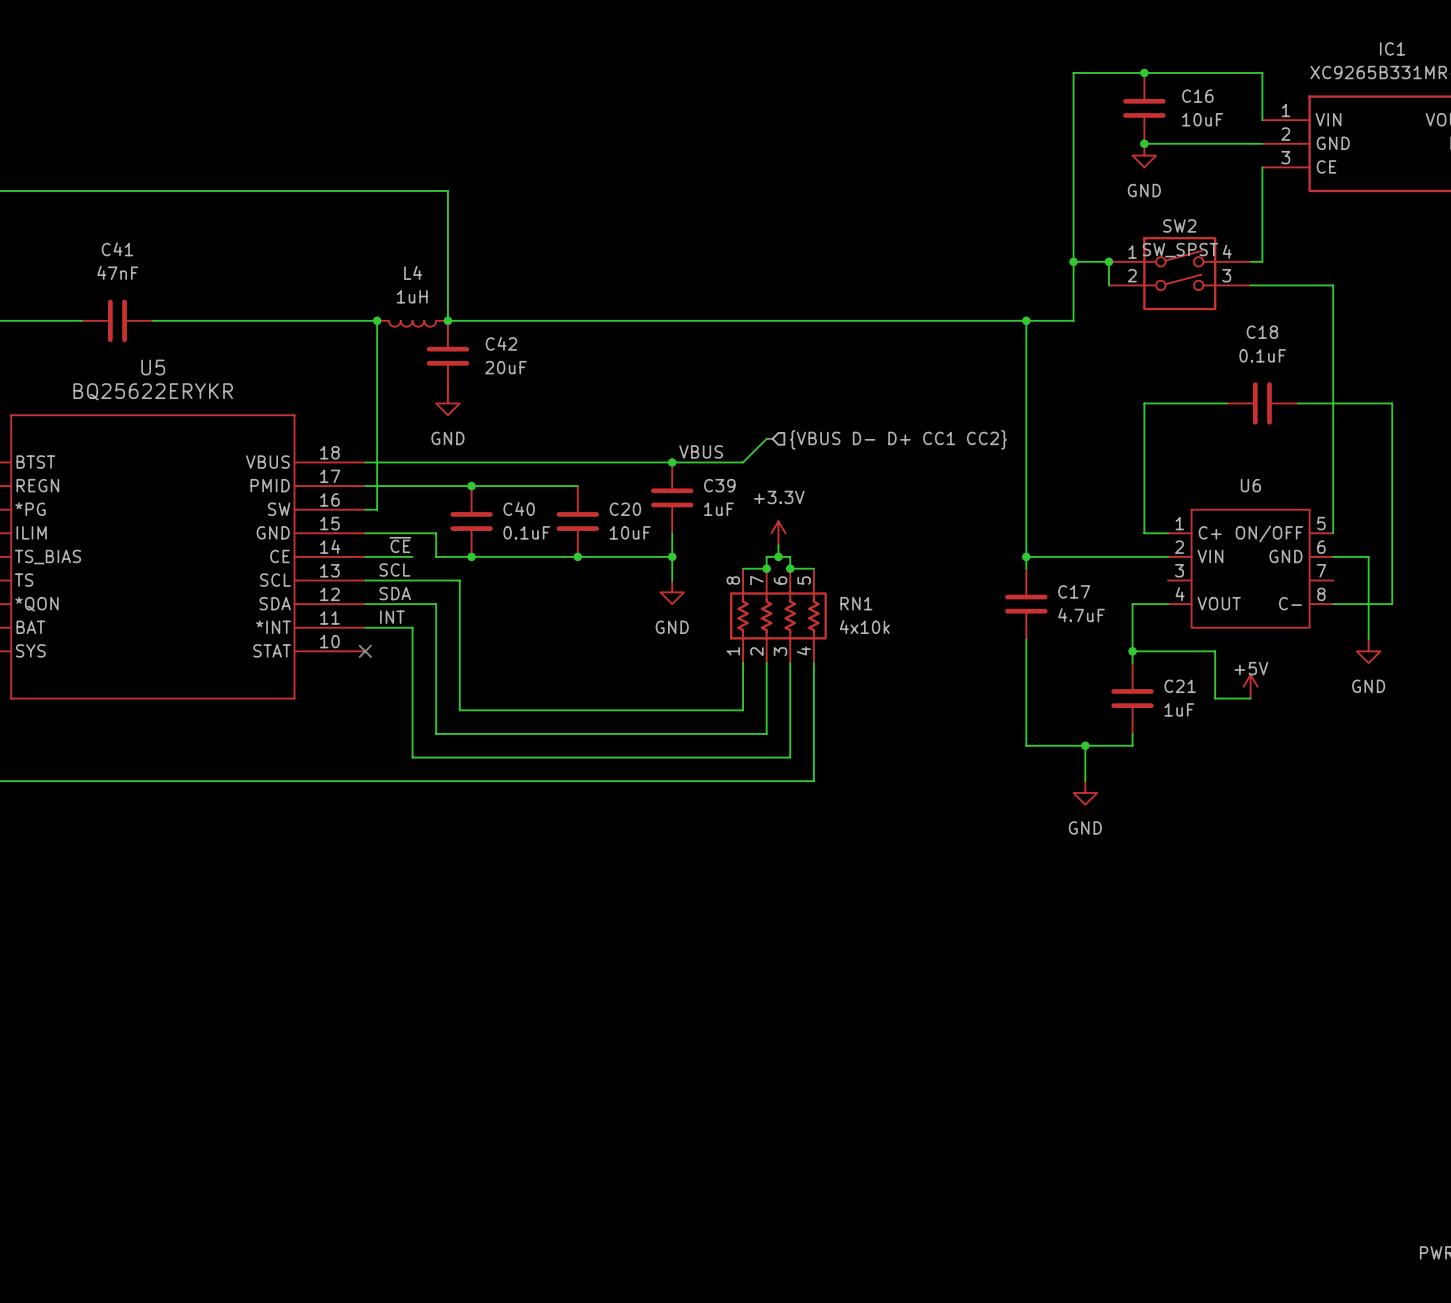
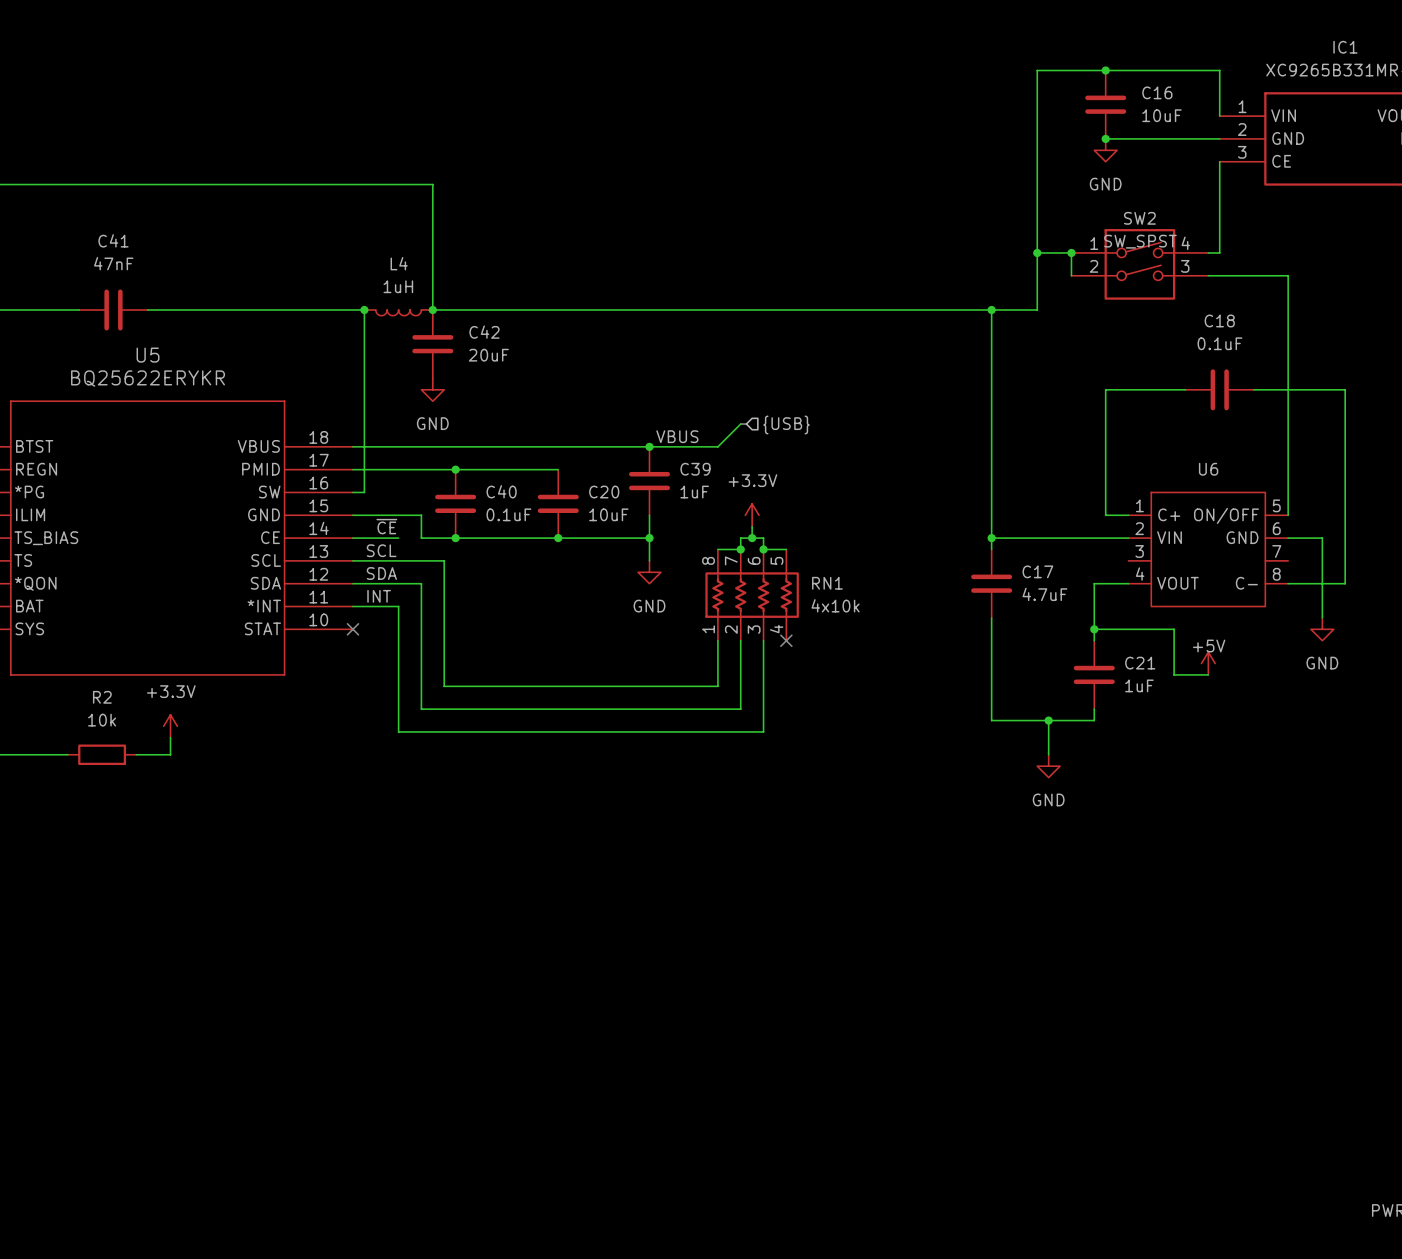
hierarchical label: {VBUS D- D+ CC1 CC2} (898, 439) -> {USB} (786, 424)
wire: (813, 663) (813, 781) (176, 781) -> (170, 737) (170, 754)
no-connect mark: none -> (786, 640)
power symbol: none -> +3.3V (170, 726)
wire: (70, 781) (141, 781) -> none
R2: none -> 10k (102, 754)

